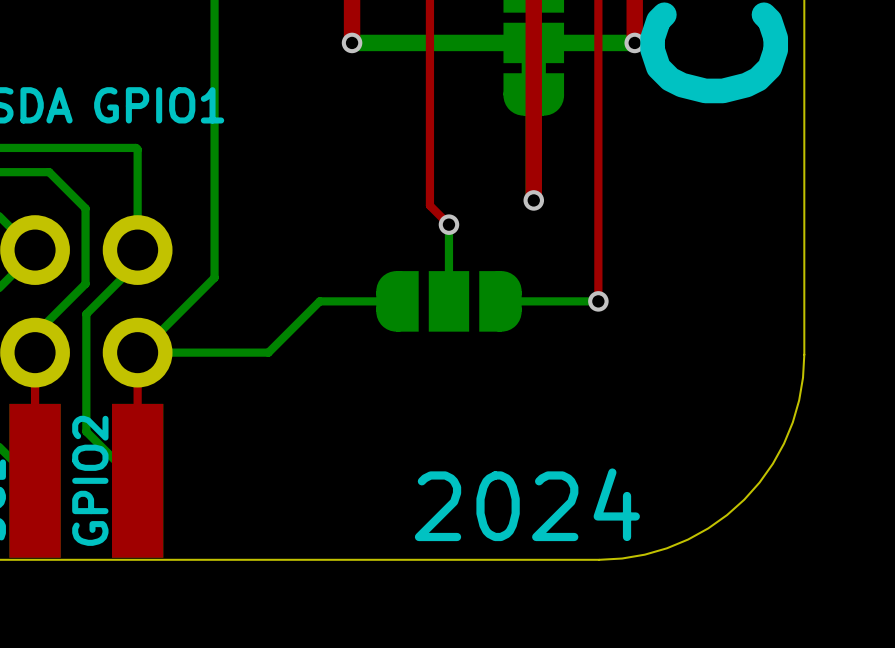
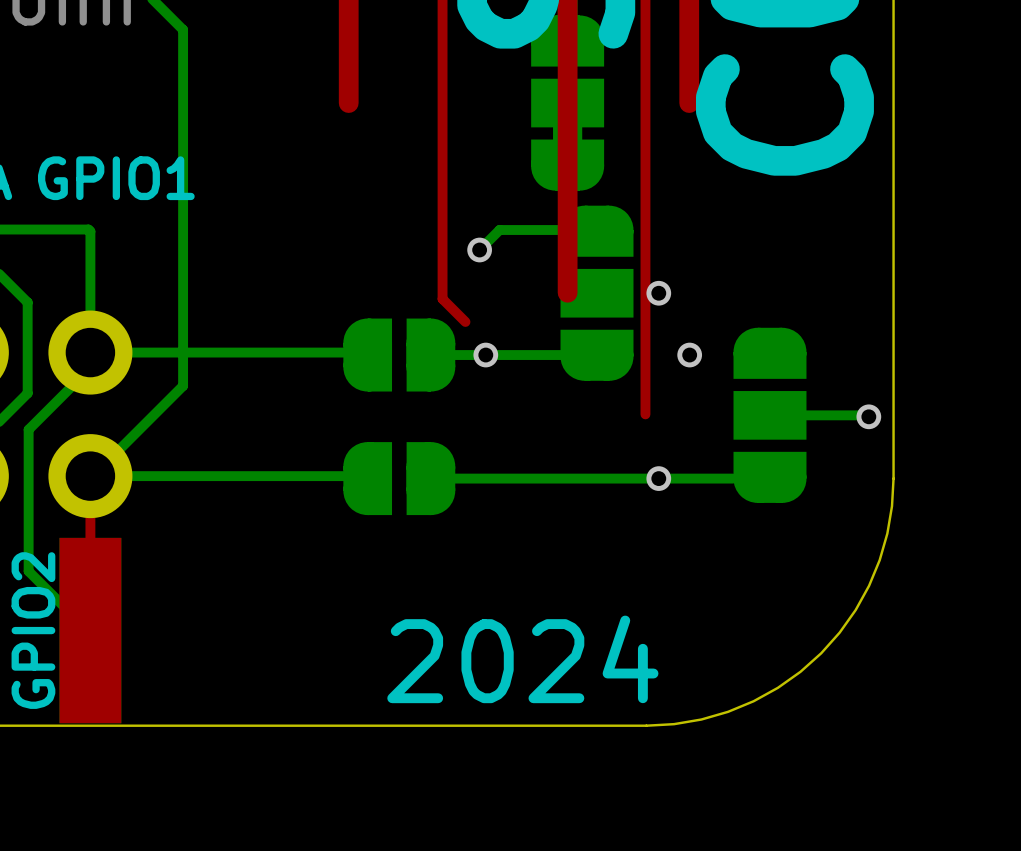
bottom track: (352, 42) (634, 42) -> none
via: (352, 42) -> none
via: (634, 42) -> none
bottom track: none -> (597, 230) (499, 230) (479, 250)
via: none -> (479, 250)
via: (533, 200) -> none
part: none -> (597, 293)
via: none -> (658, 293)
bottom track: (448, 224) (448, 301) -> none
via: (448, 224) -> none
bottom track: none -> (90, 352) (365, 352) (367, 355)
part: none -> (399, 355)
bottom track: none -> (430, 355) (597, 356)
via: none -> (485, 355)
via: none -> (689, 355)
bottom track: (396, 301) (319, 301) (268, 352) -> (367, 478) (365, 476) (248, 476)
part: (448, 301) -> none
bottom track: (501, 301) (598, 301) -> none
via: (598, 301) -> none
bottom track: none -> (769, 415) (868, 416)
part: none -> (769, 415)
via: none -> (868, 416)
part: none -> (399, 478)
bottom track: none -> (430, 478) (732, 478)
via: none -> (658, 478)
text position: 2024 (527, 504) -> 2024 (522, 659)

